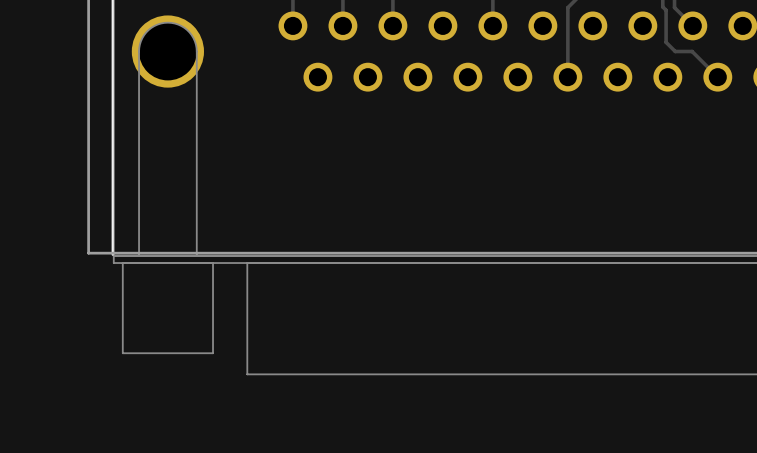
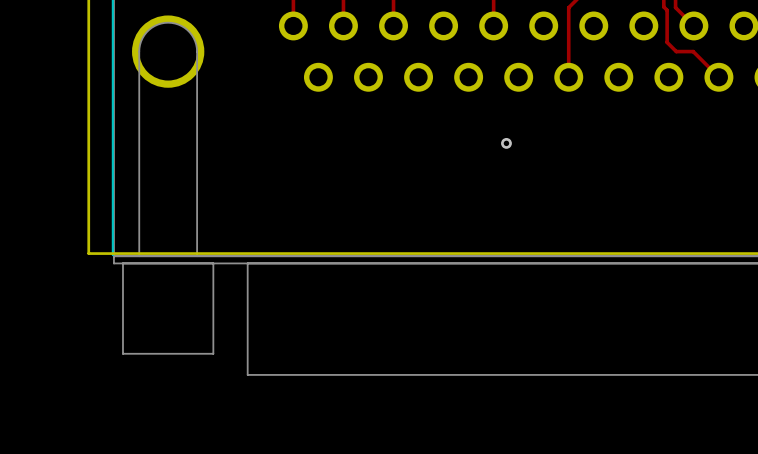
via: none -> (506, 143)

